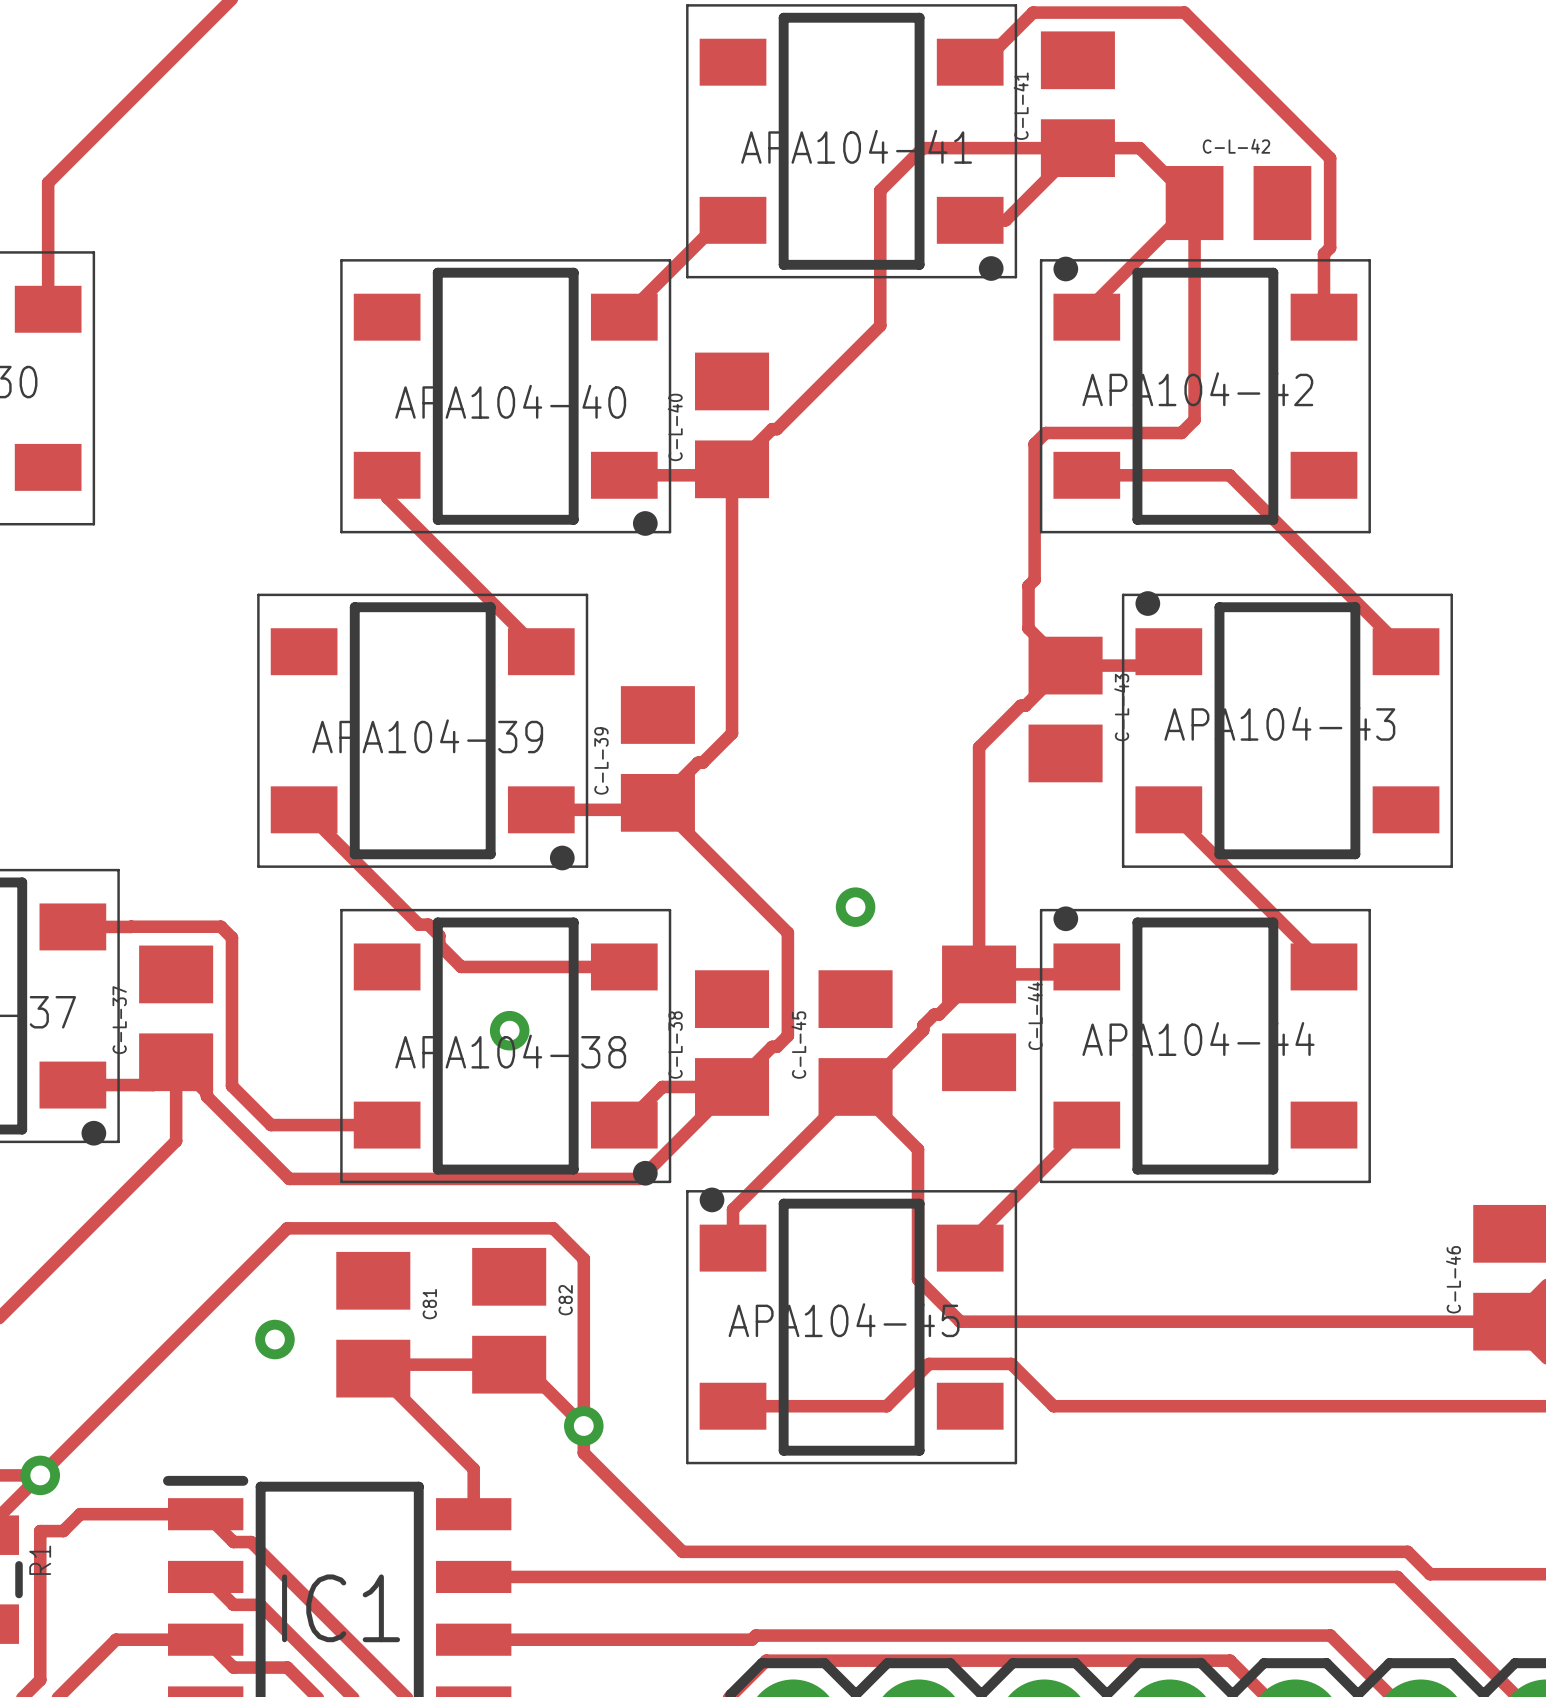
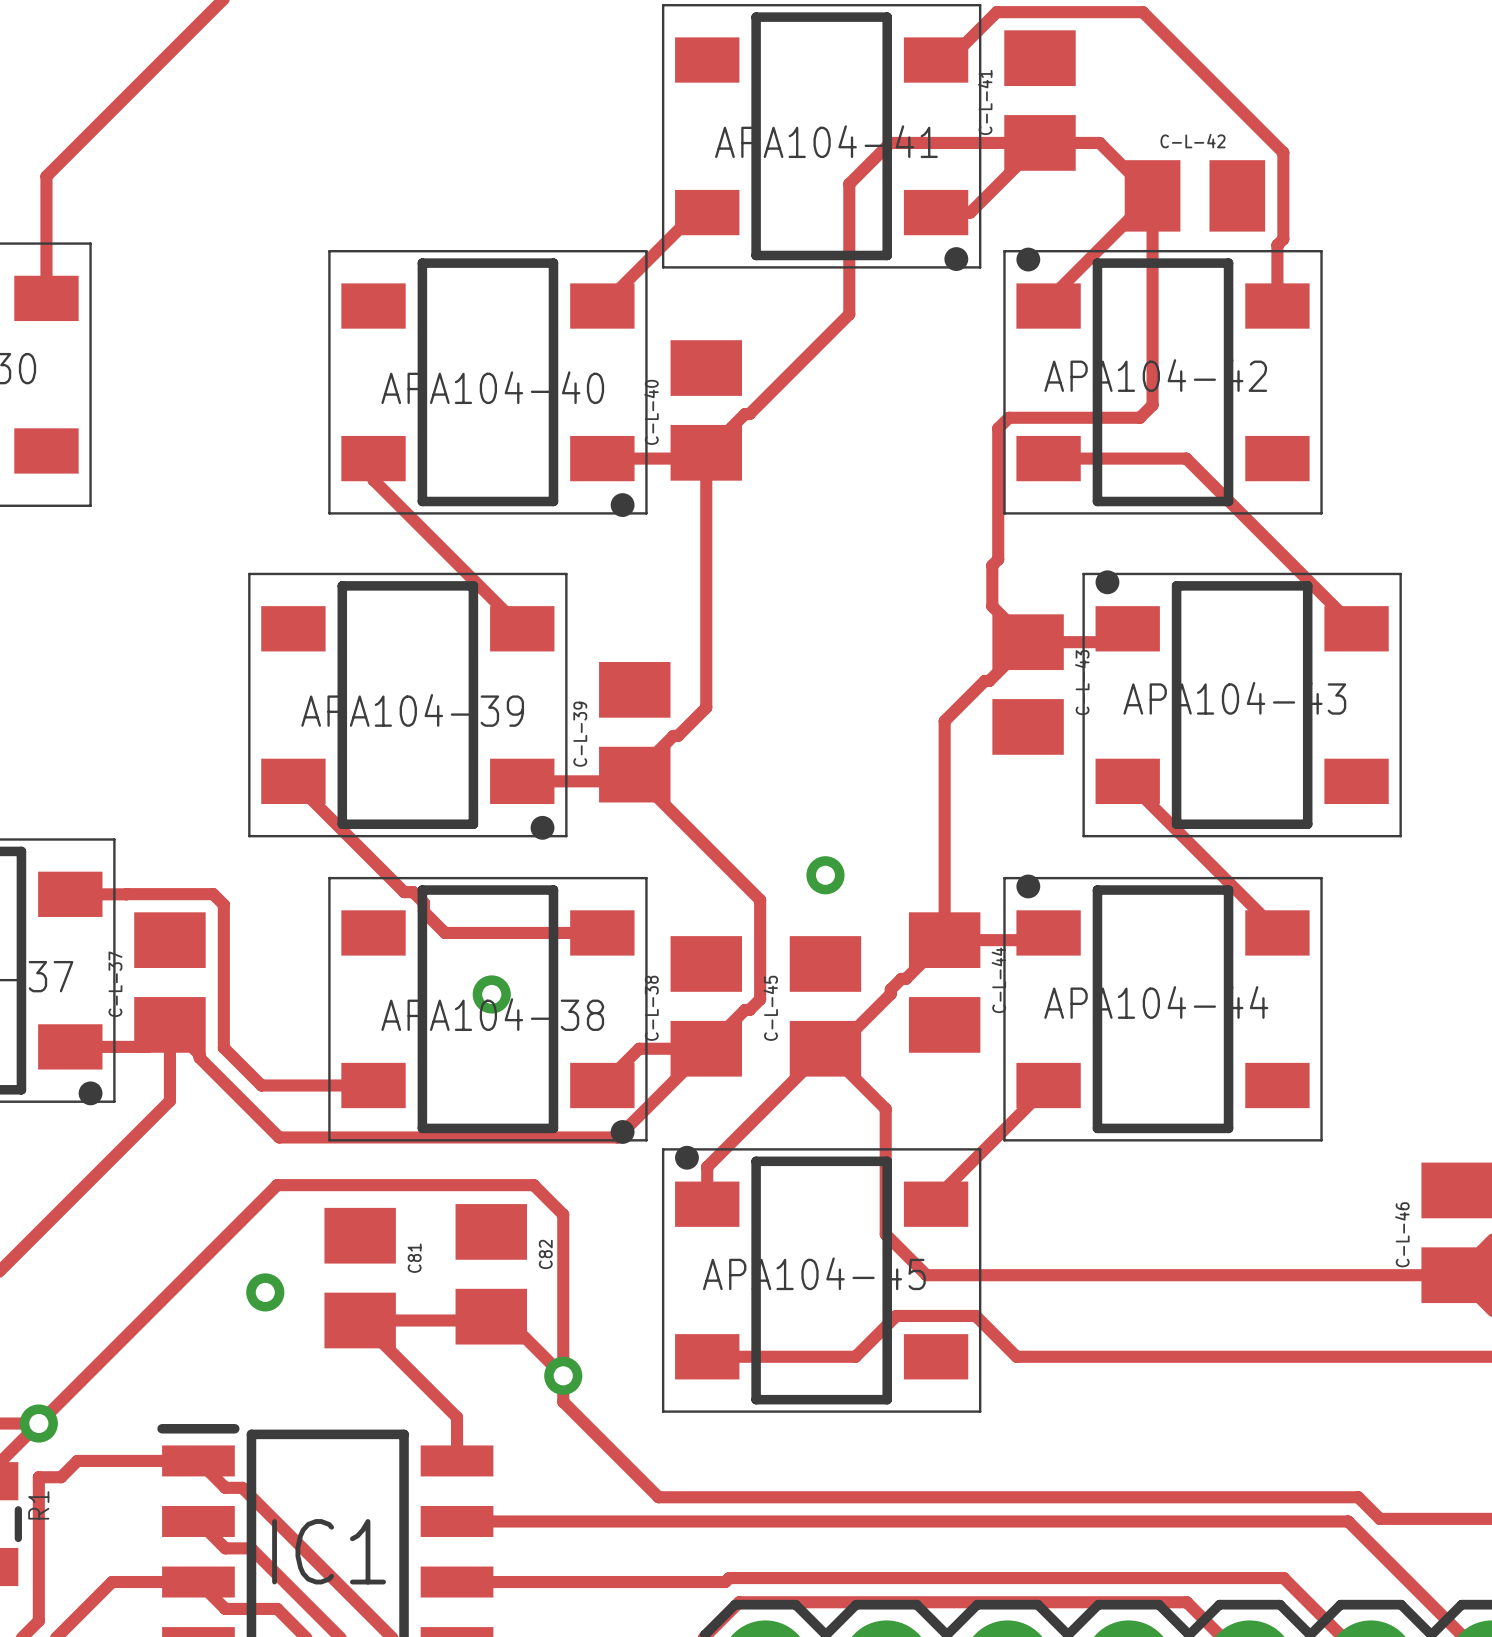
track: (509, 1364) (398, 1364) (383, 1379) -> (491, 1316) (487, 1320) (360, 1320)

